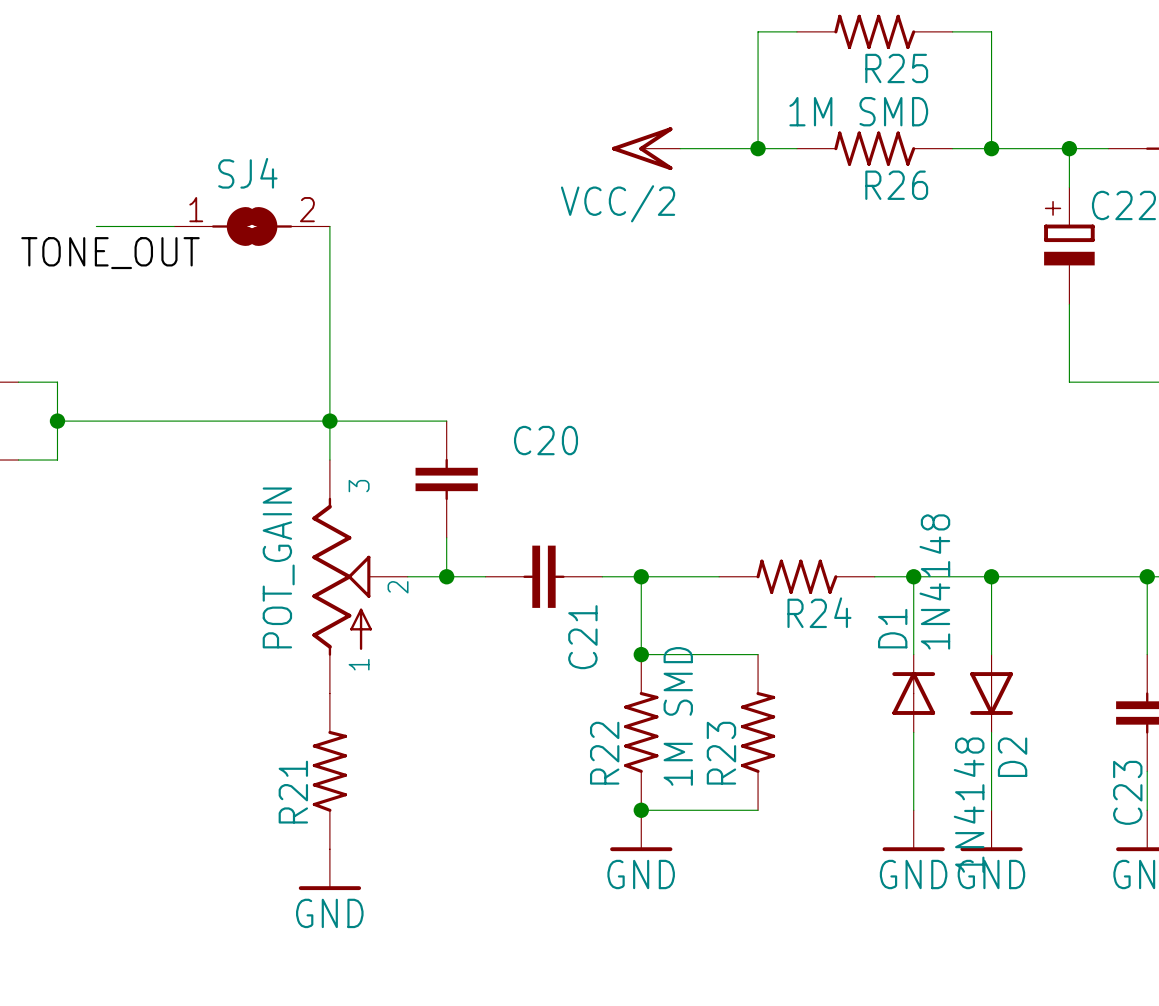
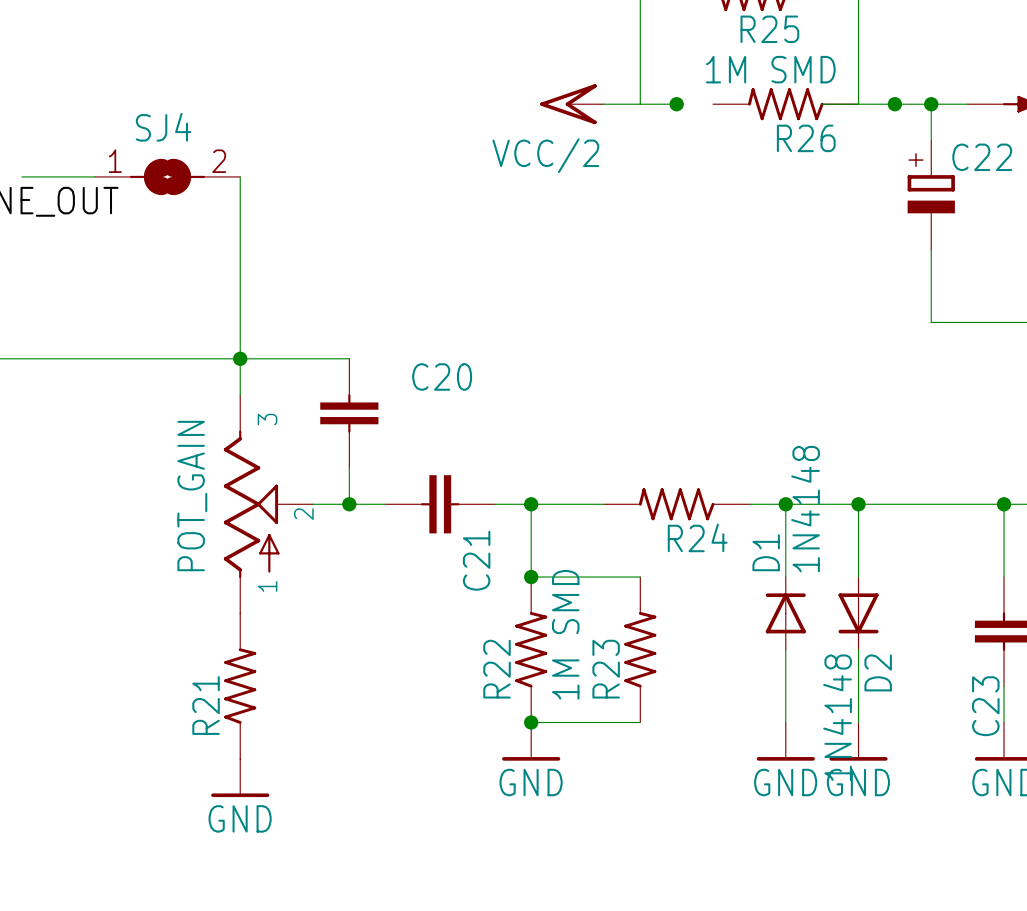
power symbol position: VCC/2 (646, 148) -> VCC/2 (572, 104)
junction position: (758, 148) -> (676, 104)
R26 position: (874, 148) -> (785, 104)
junction position: (991, 148) -> (894, 104)

